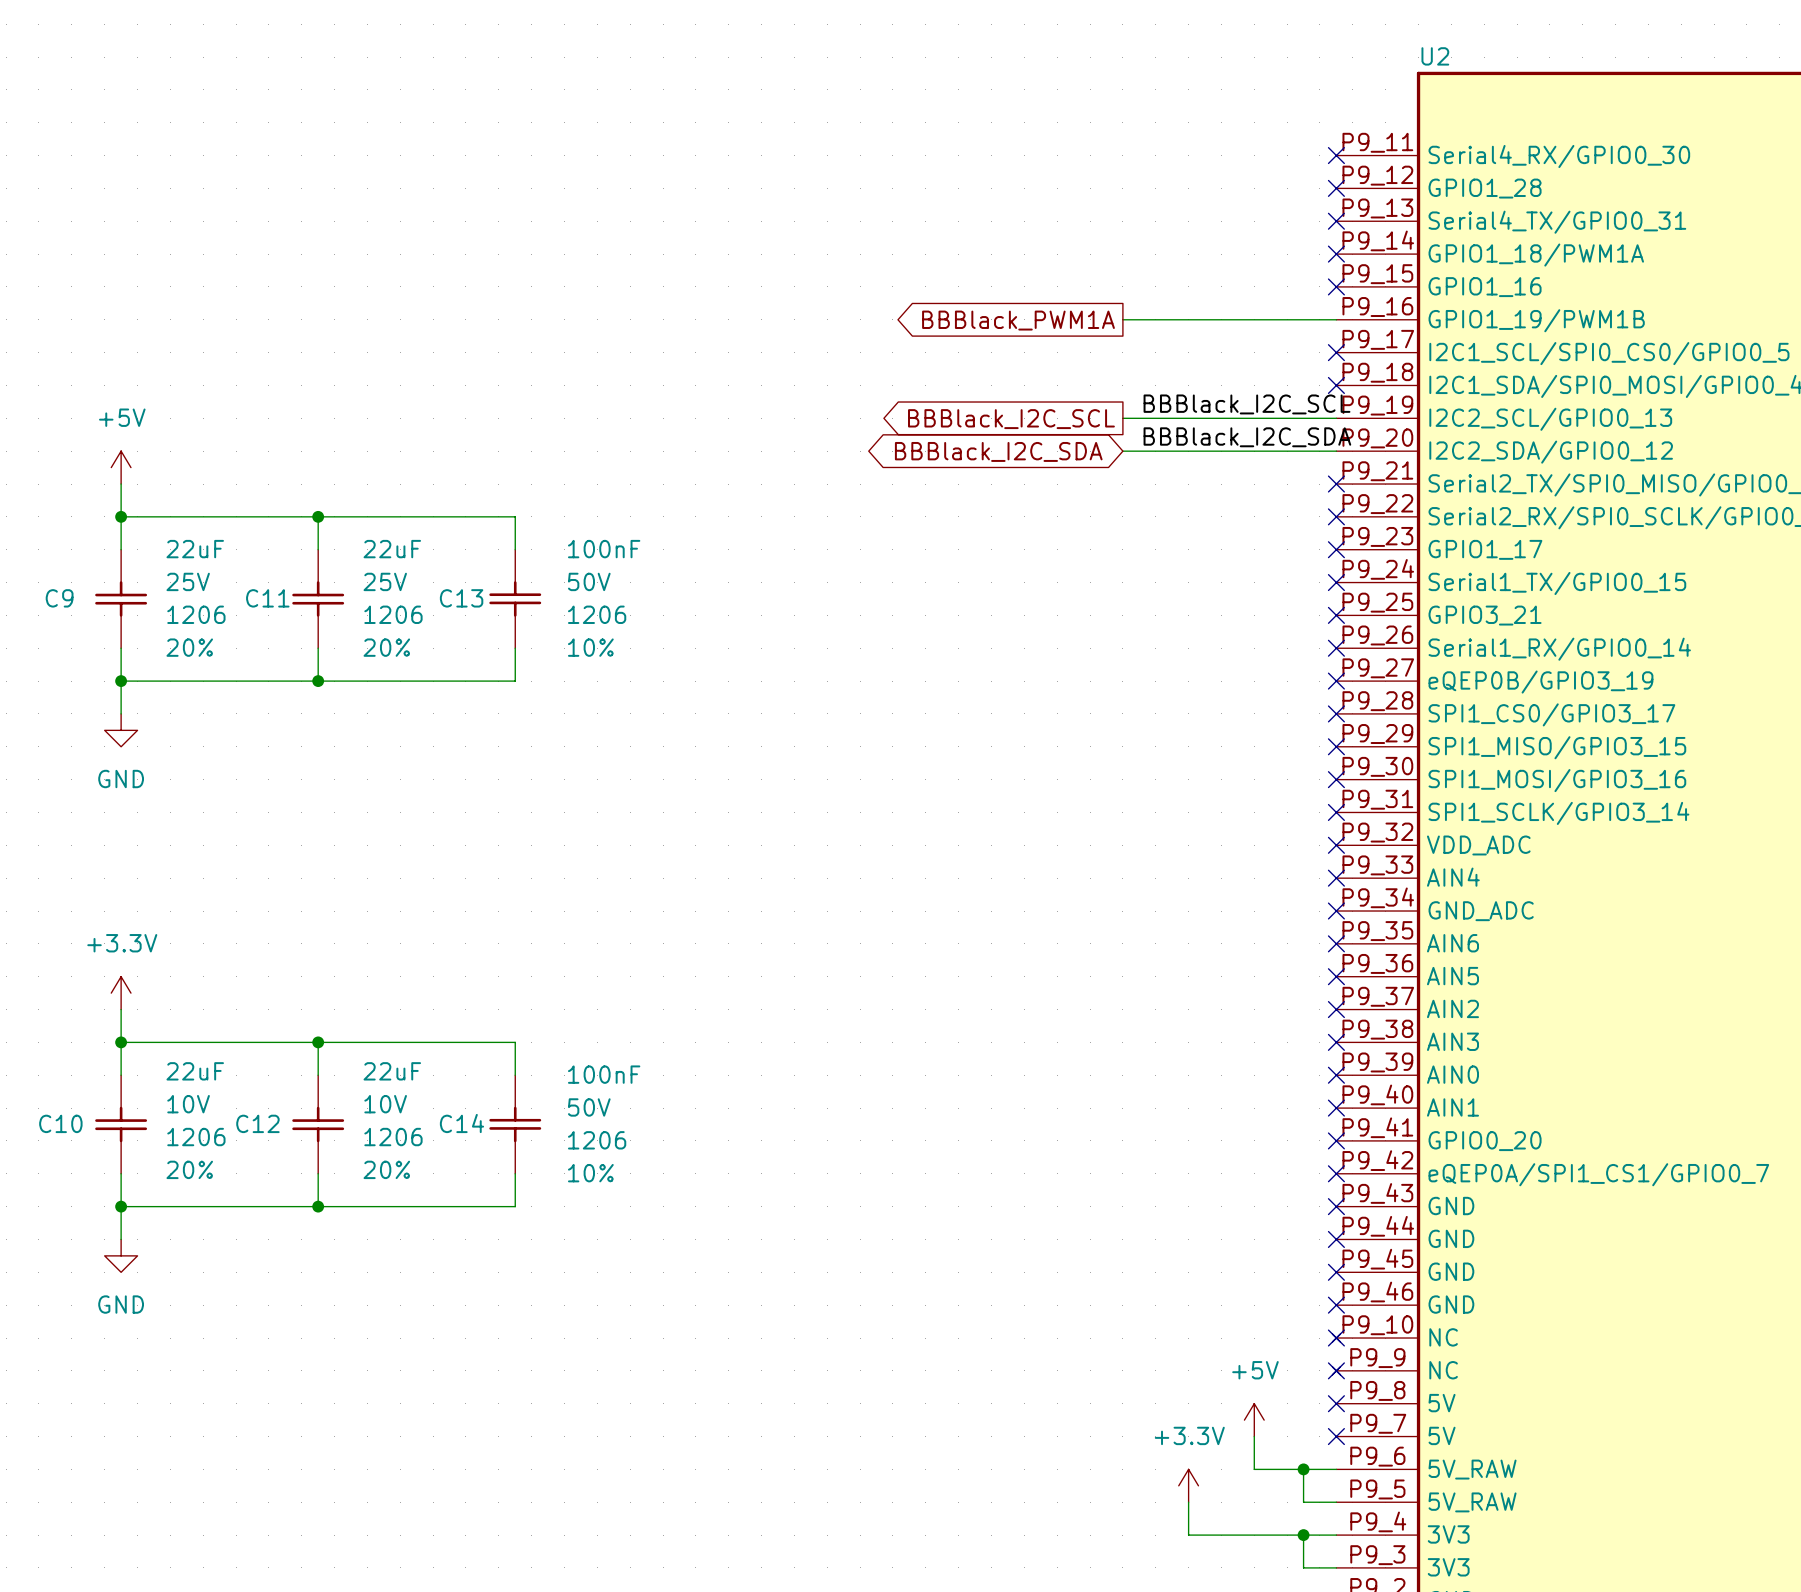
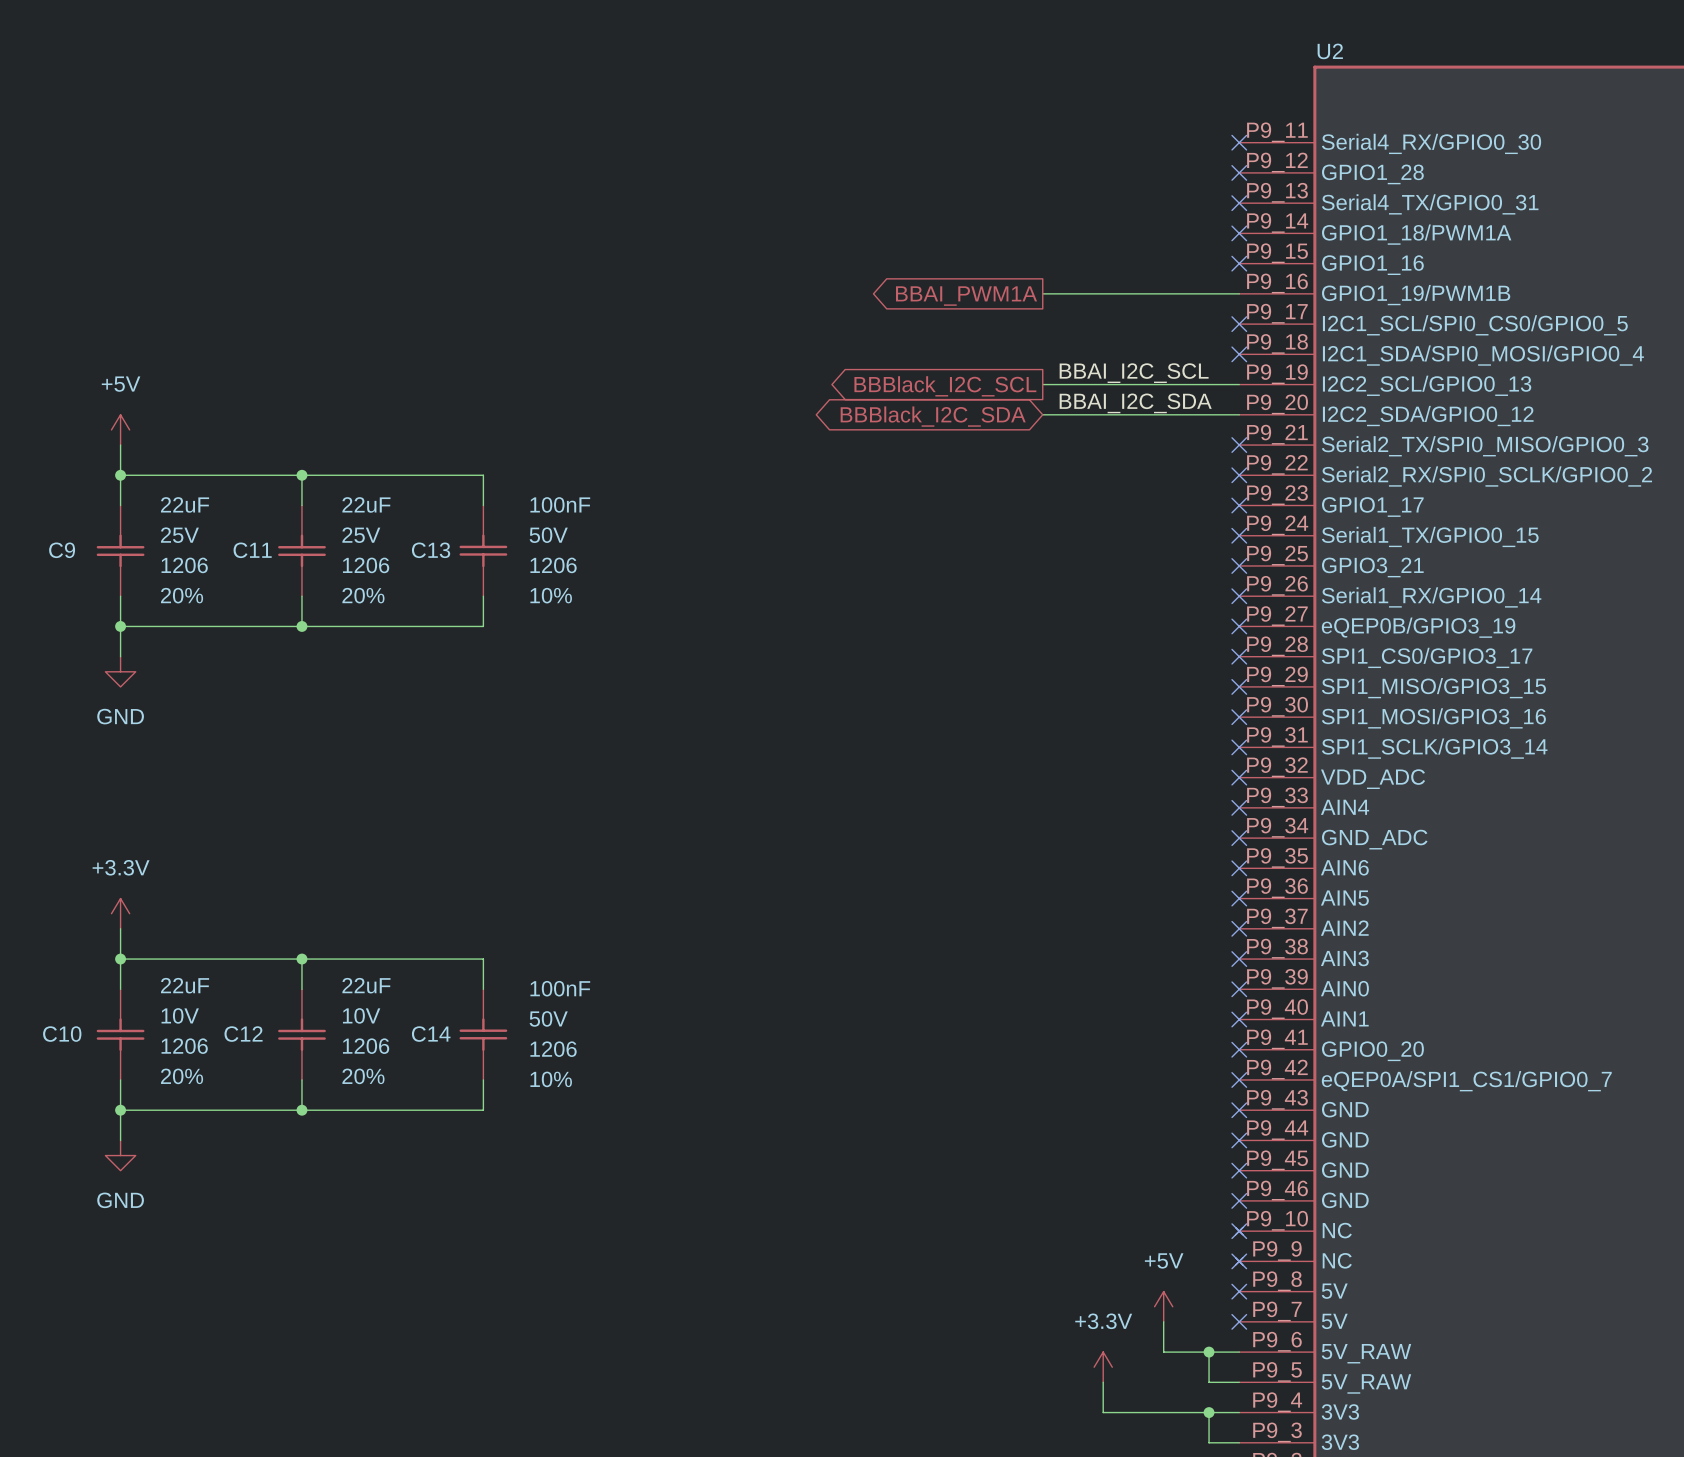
global label: BBBlack_PWM1A (1018, 320) -> BBAI_PWM1A (966, 296)
label: BBBlack_I2C_SCL (1246, 404) -> BBAI_I2C_SCL (1134, 373)
label: BBBlack_I2C_SDA (1247, 437) -> BBAI_I2C_SDA (1135, 403)

